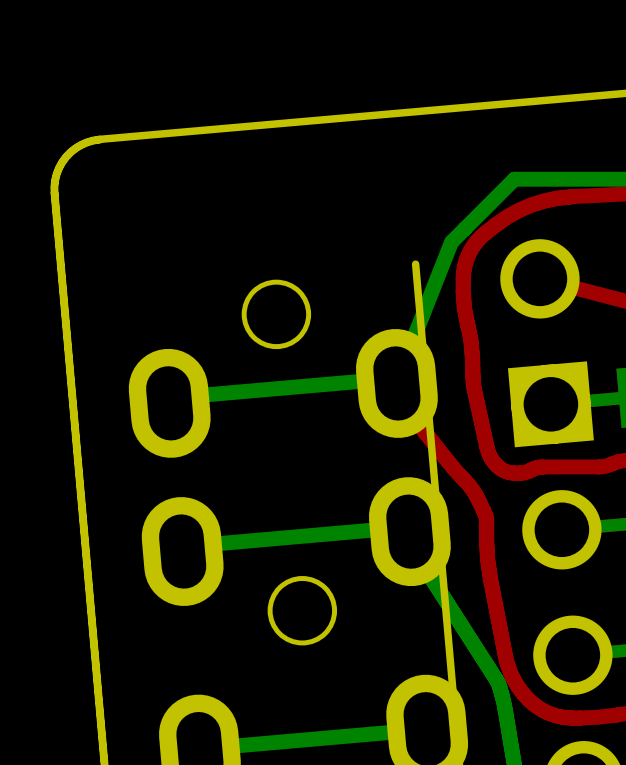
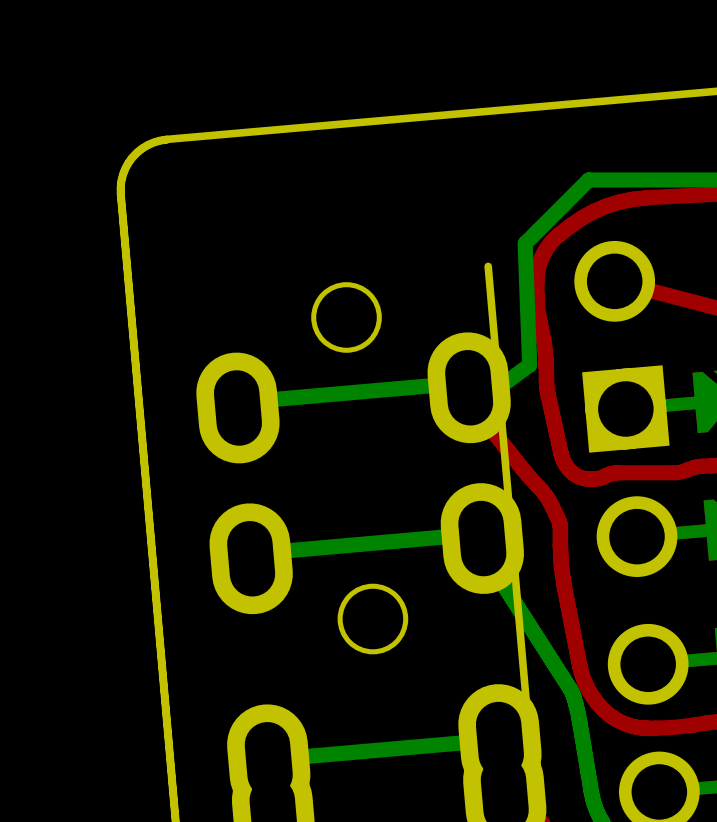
bottom track: (451, 242) (395, 384) -> (525, 243) (529, 364) (477, 403)

